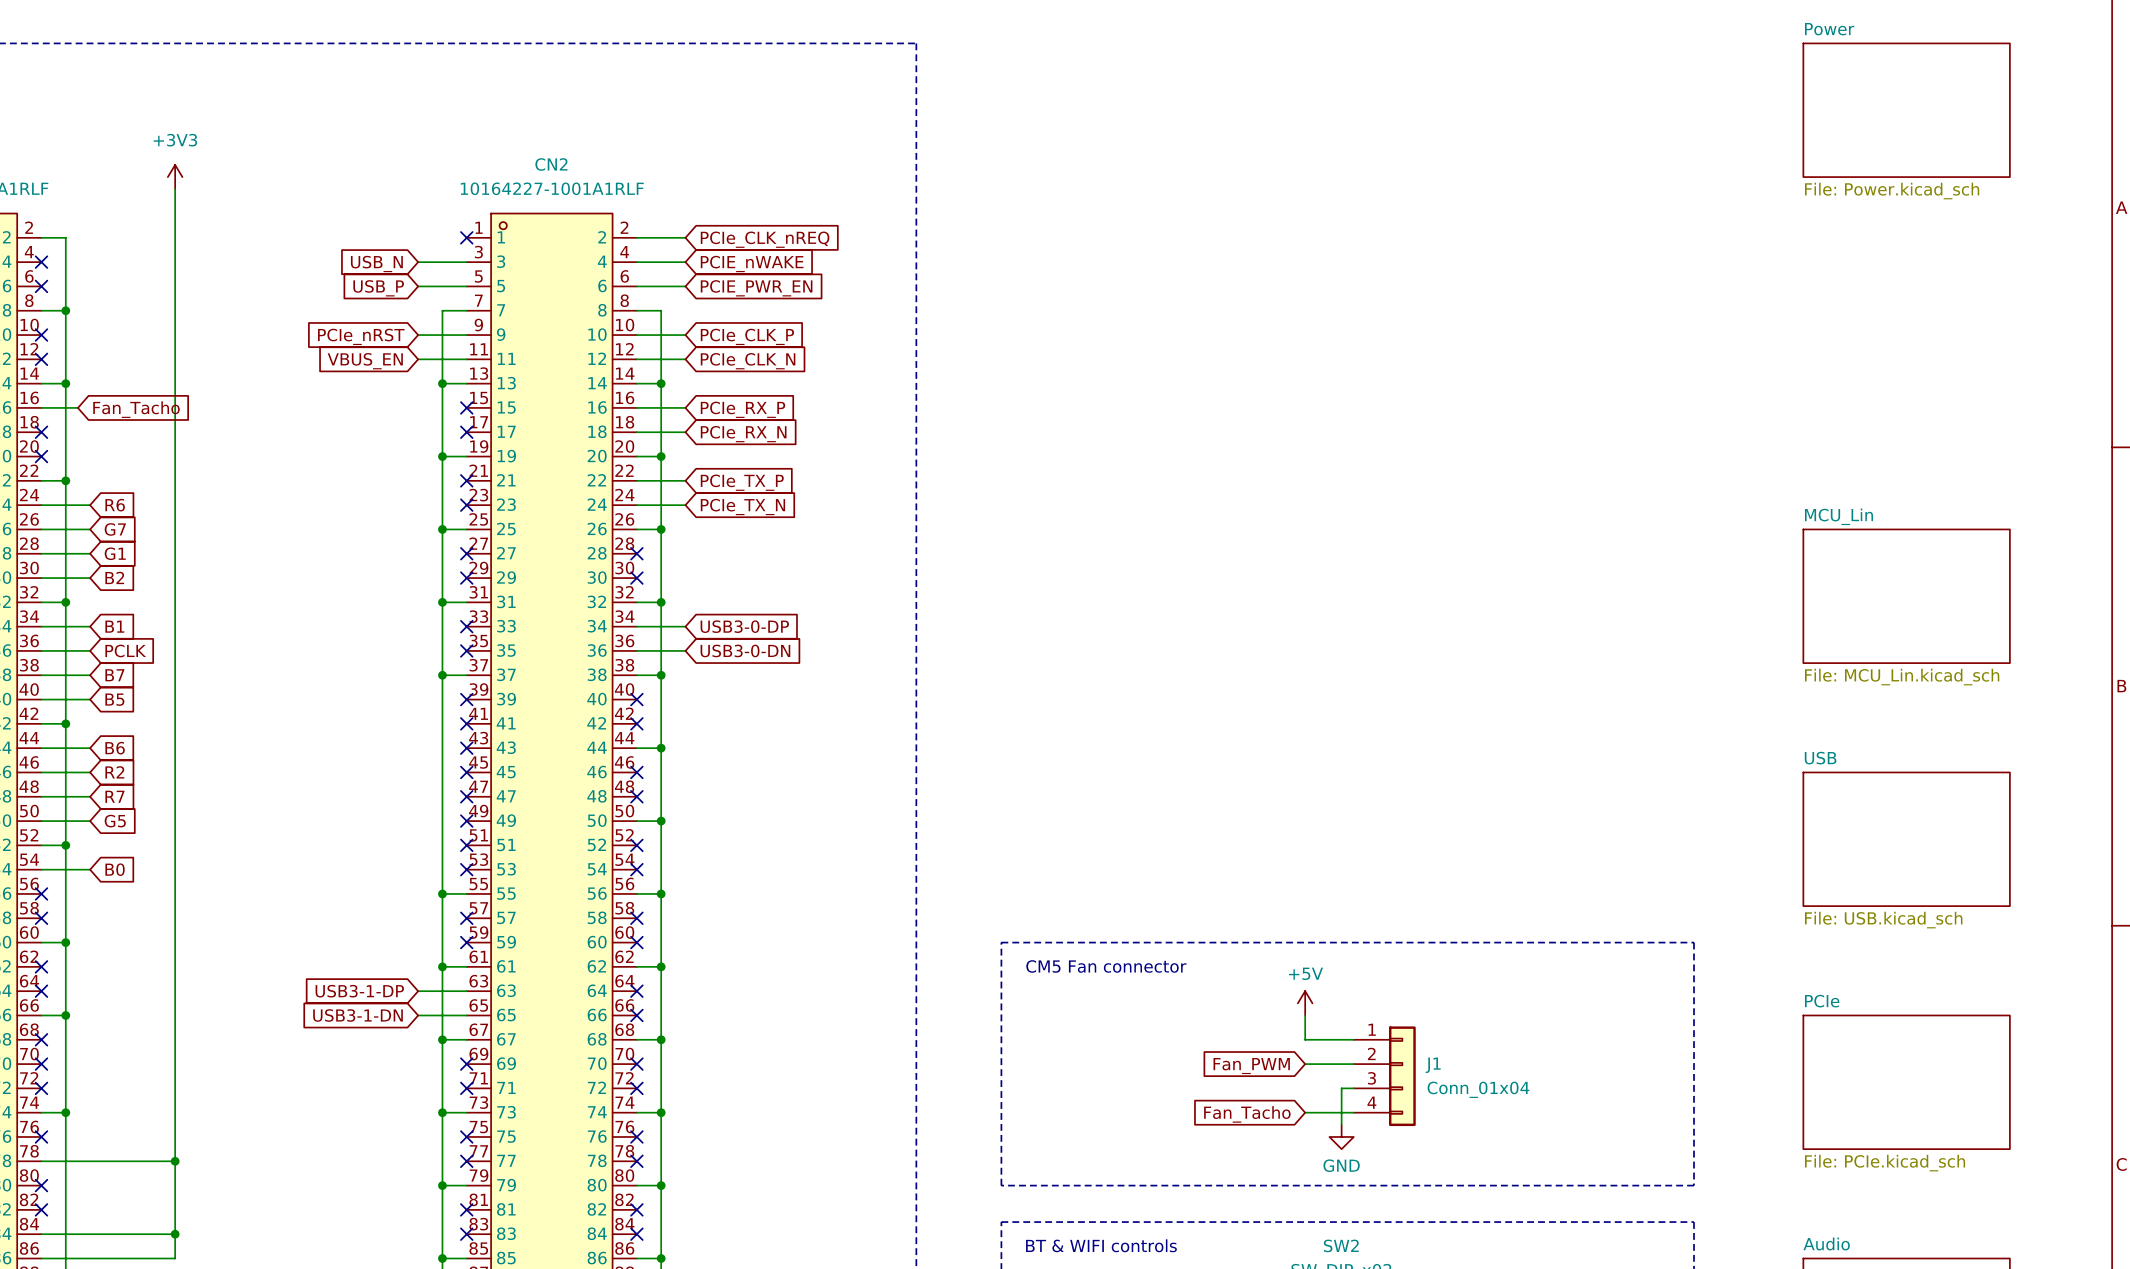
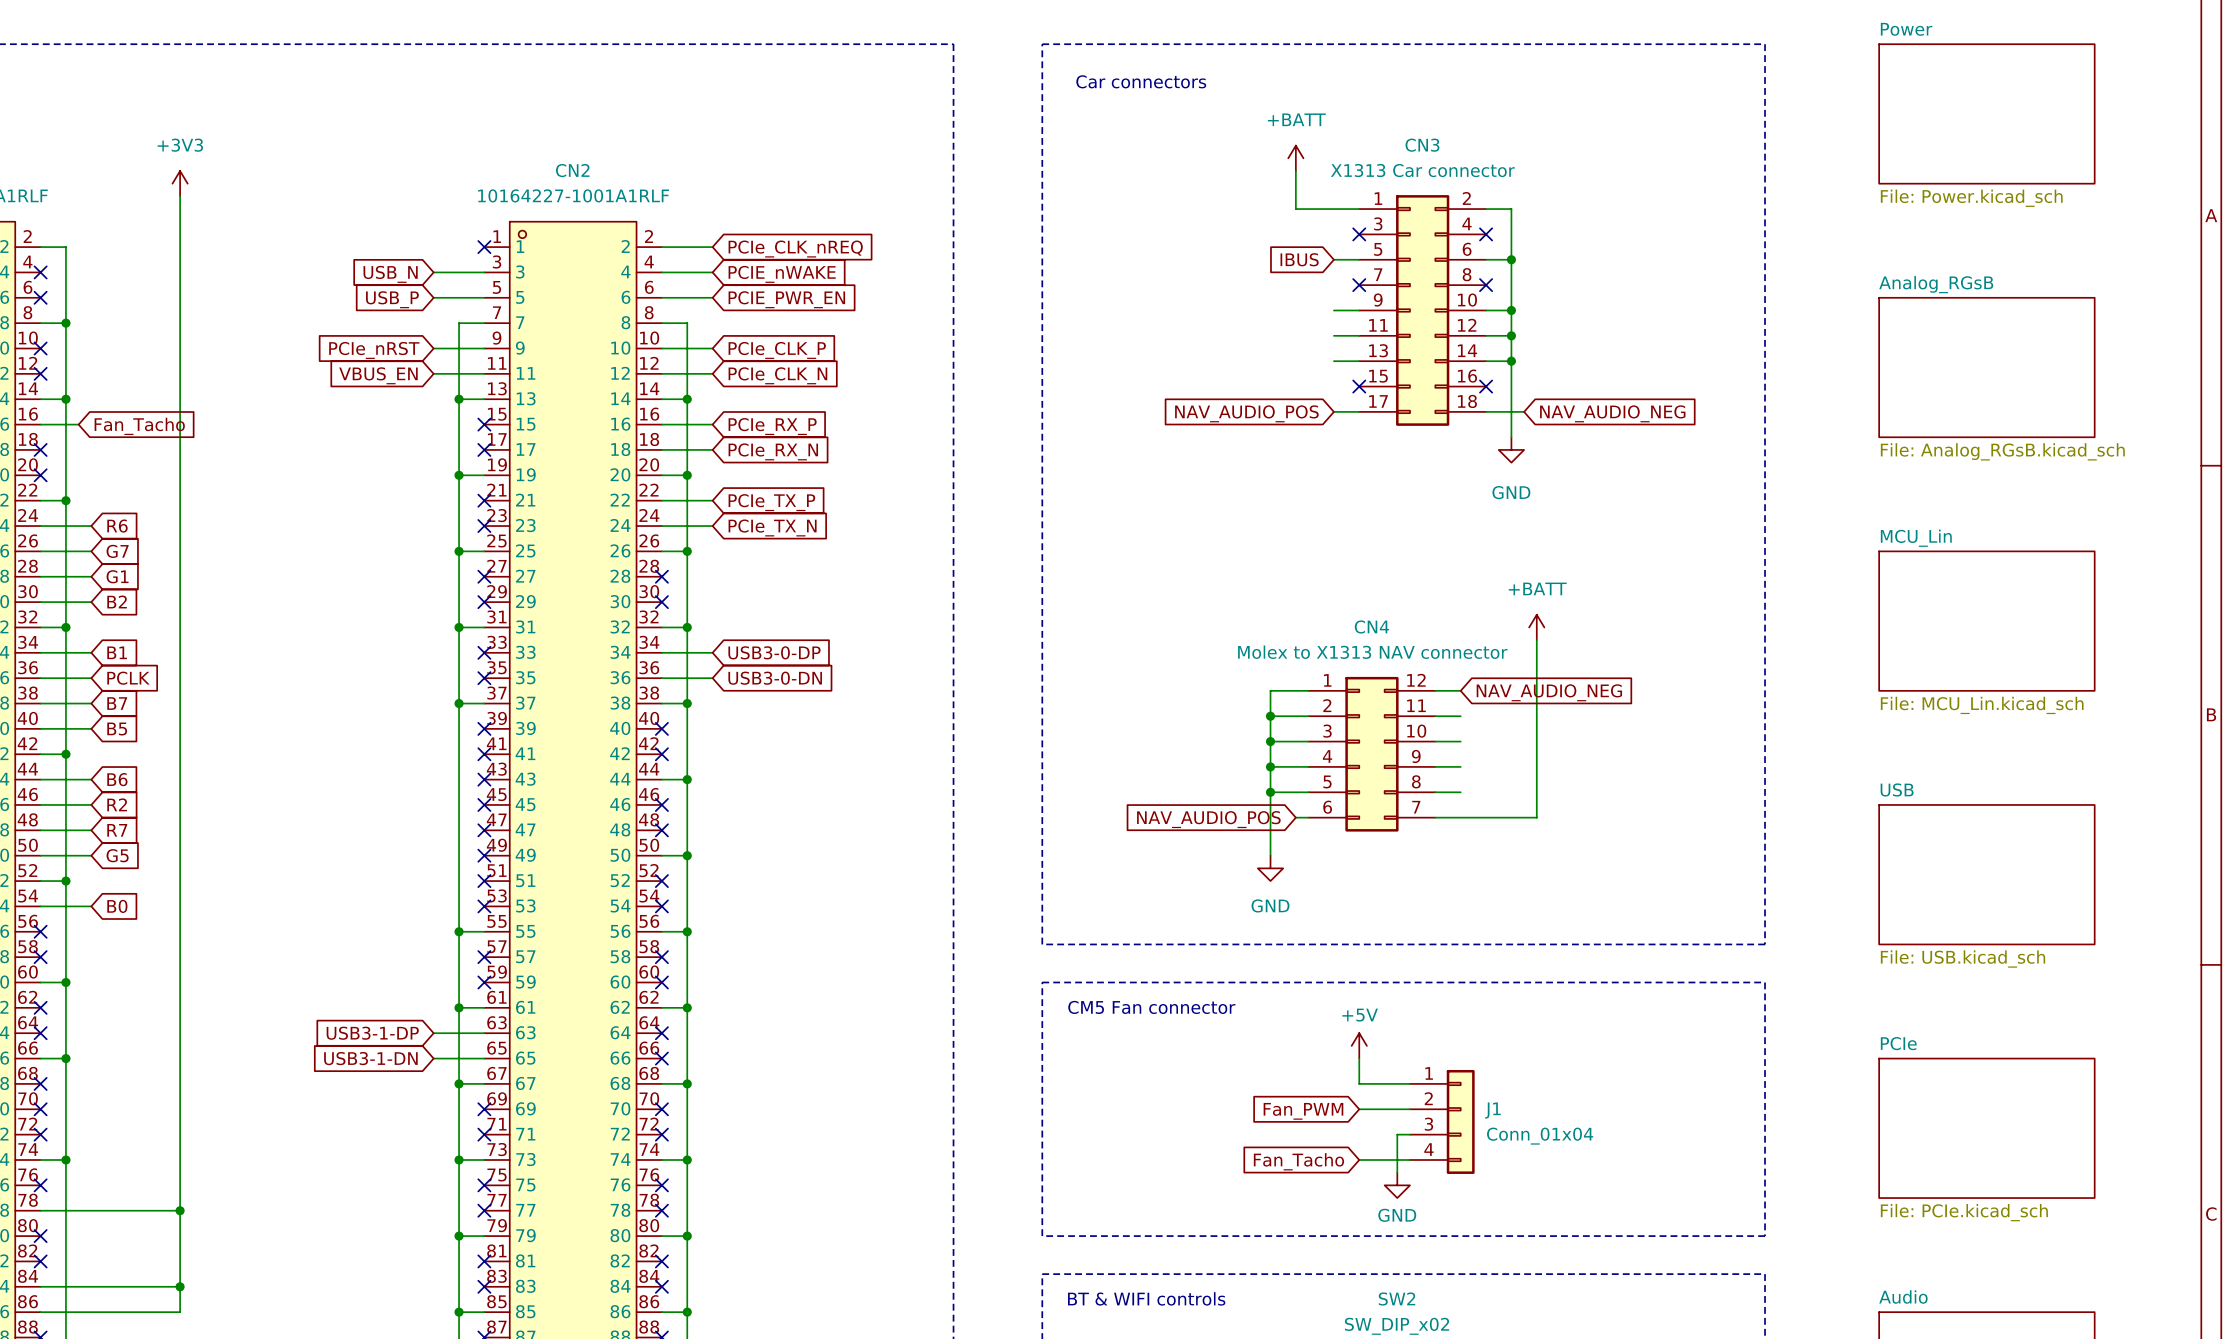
line: none -> (1042, 44) (1765, 44) (1765, 944) (1042, 944) (1042, 44)
text: none -> Car connectors (1141, 81)
power symbol: none -> +BATT (1295, 158)
wire: none -> (1295, 171) (1295, 209) (1359, 209)
wire: none -> (1486, 209) (1511, 209) (1511, 437)
no-connect mark: none -> (1359, 234)
no-connect mark: none -> (1486, 234)
global label: none -> IBUS (1299, 259)
wire: none -> (1333, 259) (1359, 259)
wire: none -> (1486, 259) (1511, 259)
junction: none -> (1511, 259)
no-connect mark: none -> (1359, 285)
no-connect mark: none -> (1486, 285)
wire: none -> (1333, 310) (1359, 310)
CN3: none -> X1313 Car connector (1422, 310)
wire: none -> (1486, 310) (1511, 310)
junction: none -> (1511, 310)
wire: none -> (1333, 335) (1359, 335)
wire: none -> (1486, 335) (1511, 335)
junction: none -> (1511, 335)
wire: none -> (1333, 361) (1359, 361)
wire: none -> (1486, 361) (1511, 361)
junction: none -> (1511, 361)
sheet Analog_RGsB: none -> File: Analog_RGsB.kicad_sch (1986, 367)
no-connect mark: none -> (1359, 386)
no-connect mark: none -> (1486, 386)
wire: none -> (1333, 411) (1359, 411)
wire: none -> (1486, 411) (1524, 411)
global label: none -> NAV_AUDIO_POS (1246, 413)
global label: none -> NAV_AUDIO_NEG (1612, 413)
power symbol: none -> GND (1511, 449)
power symbol: none -> +BATT (1536, 627)
wire: none -> (1536, 640) (1536, 817) (1435, 817)
wire: none -> (1308, 690) (1270, 690) (1270, 855)
wire: none -> (1435, 690) (1460, 690)
global label: none -> NAV_AUDIO_NEG (1549, 692)
wire: none -> (1270, 716) (1308, 716)
junction: none -> (1270, 716)
wire: none -> (1435, 716) (1460, 716)
wire: none -> (1270, 741) (1308, 741)
junction: none -> (1270, 741)
wire: none -> (1435, 741) (1460, 741)
CN4: none -> Molex to X1313 NAV connector (1371, 754)
wire: none -> (1270, 766) (1308, 766)
junction: none -> (1270, 766)
wire: none -> (1435, 766) (1460, 766)
wire: none -> (1270, 792) (1308, 792)
junction: none -> (1270, 792)
wire: none -> (1435, 792) (1460, 792)
wire: none -> (1295, 817) (1308, 817)
global label: none -> NAV_AUDIO_POS (1208, 819)
power symbol: none -> GND (1270, 868)

